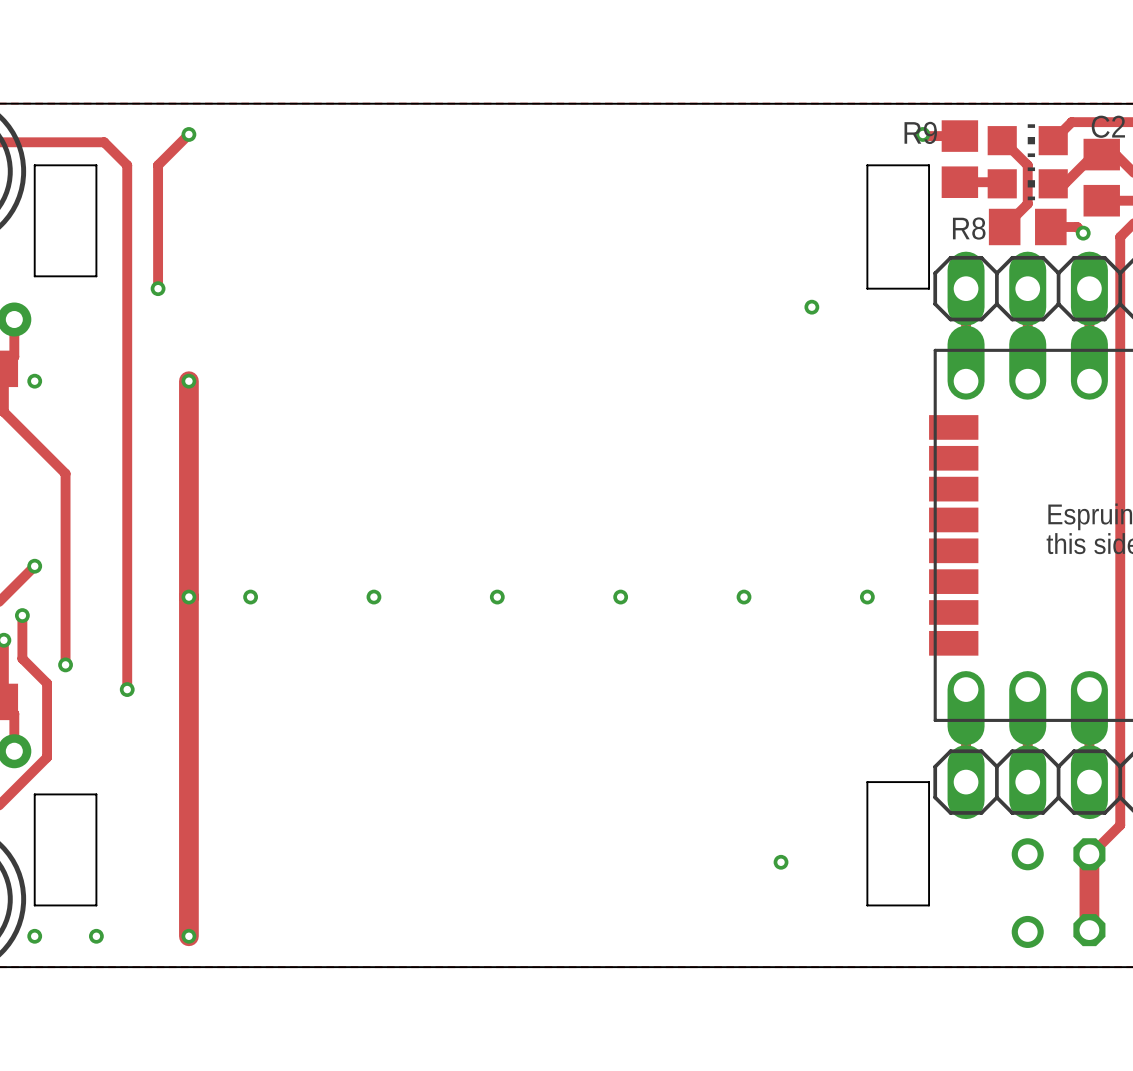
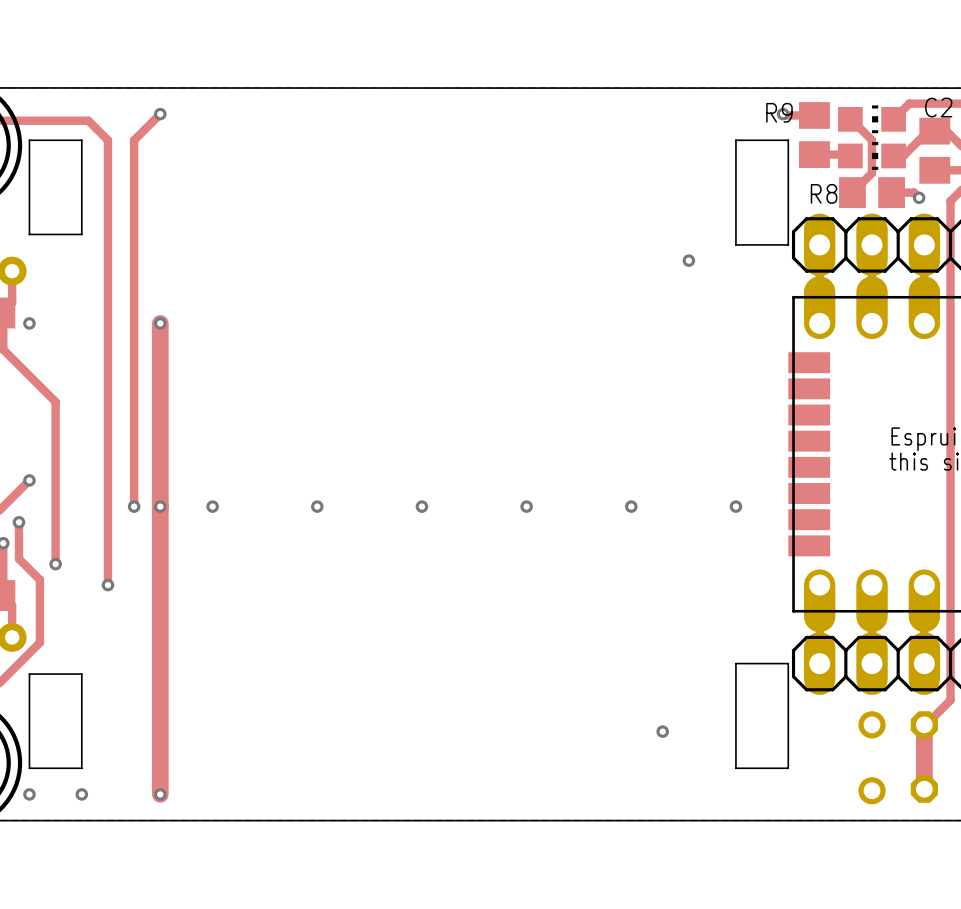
track: none -> (134, 244) (134, 506)
via: (158, 288) -> none
via: none -> (134, 506)

